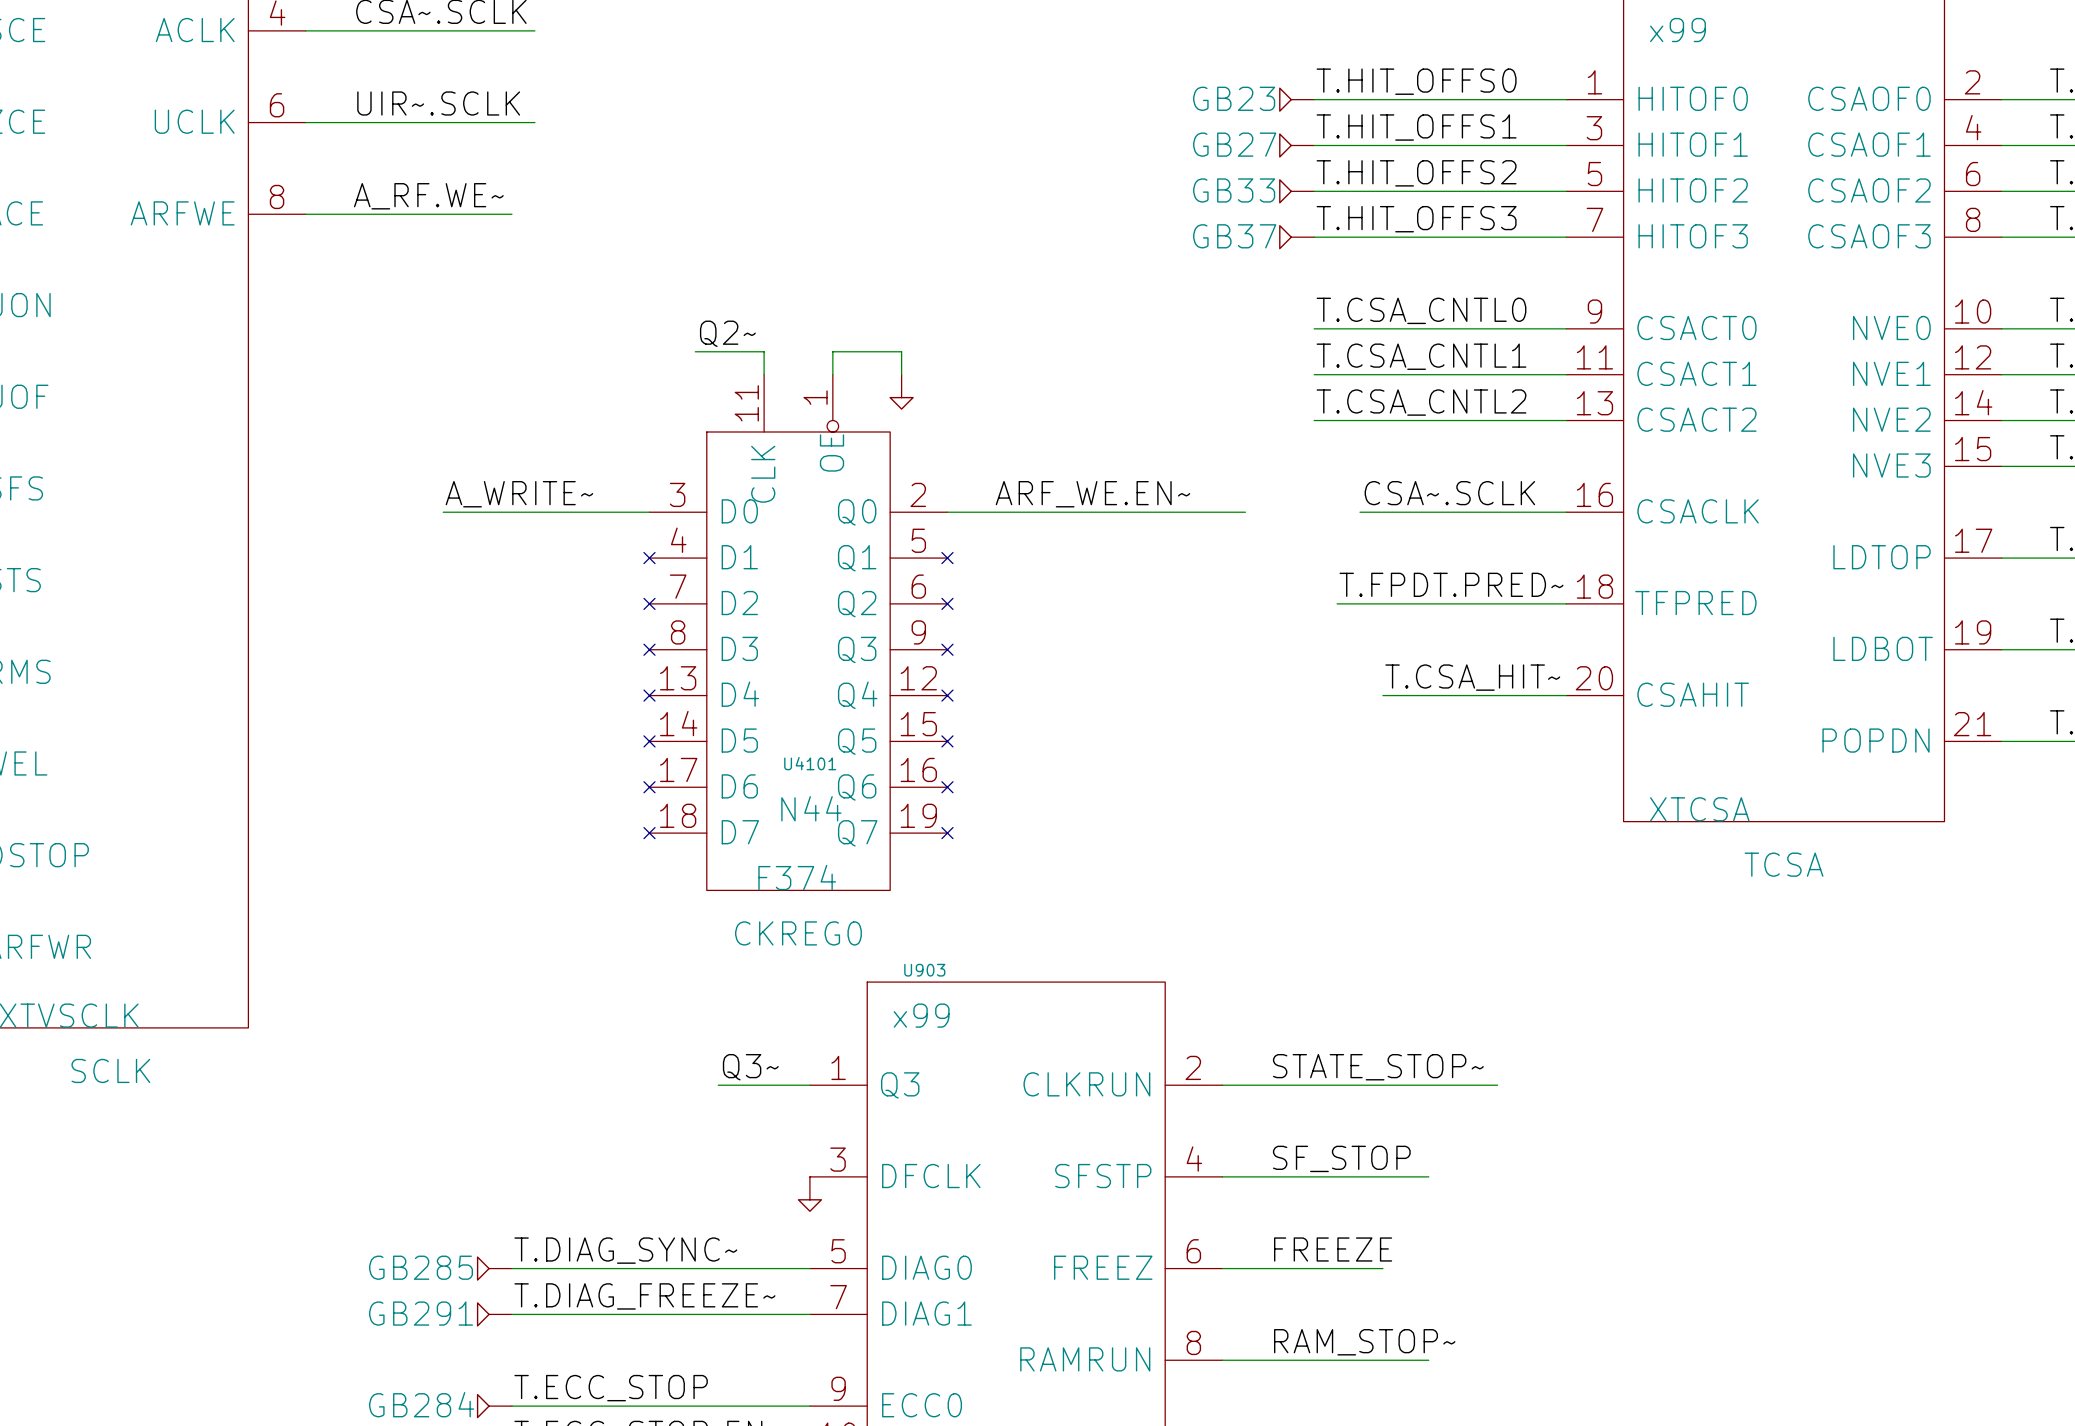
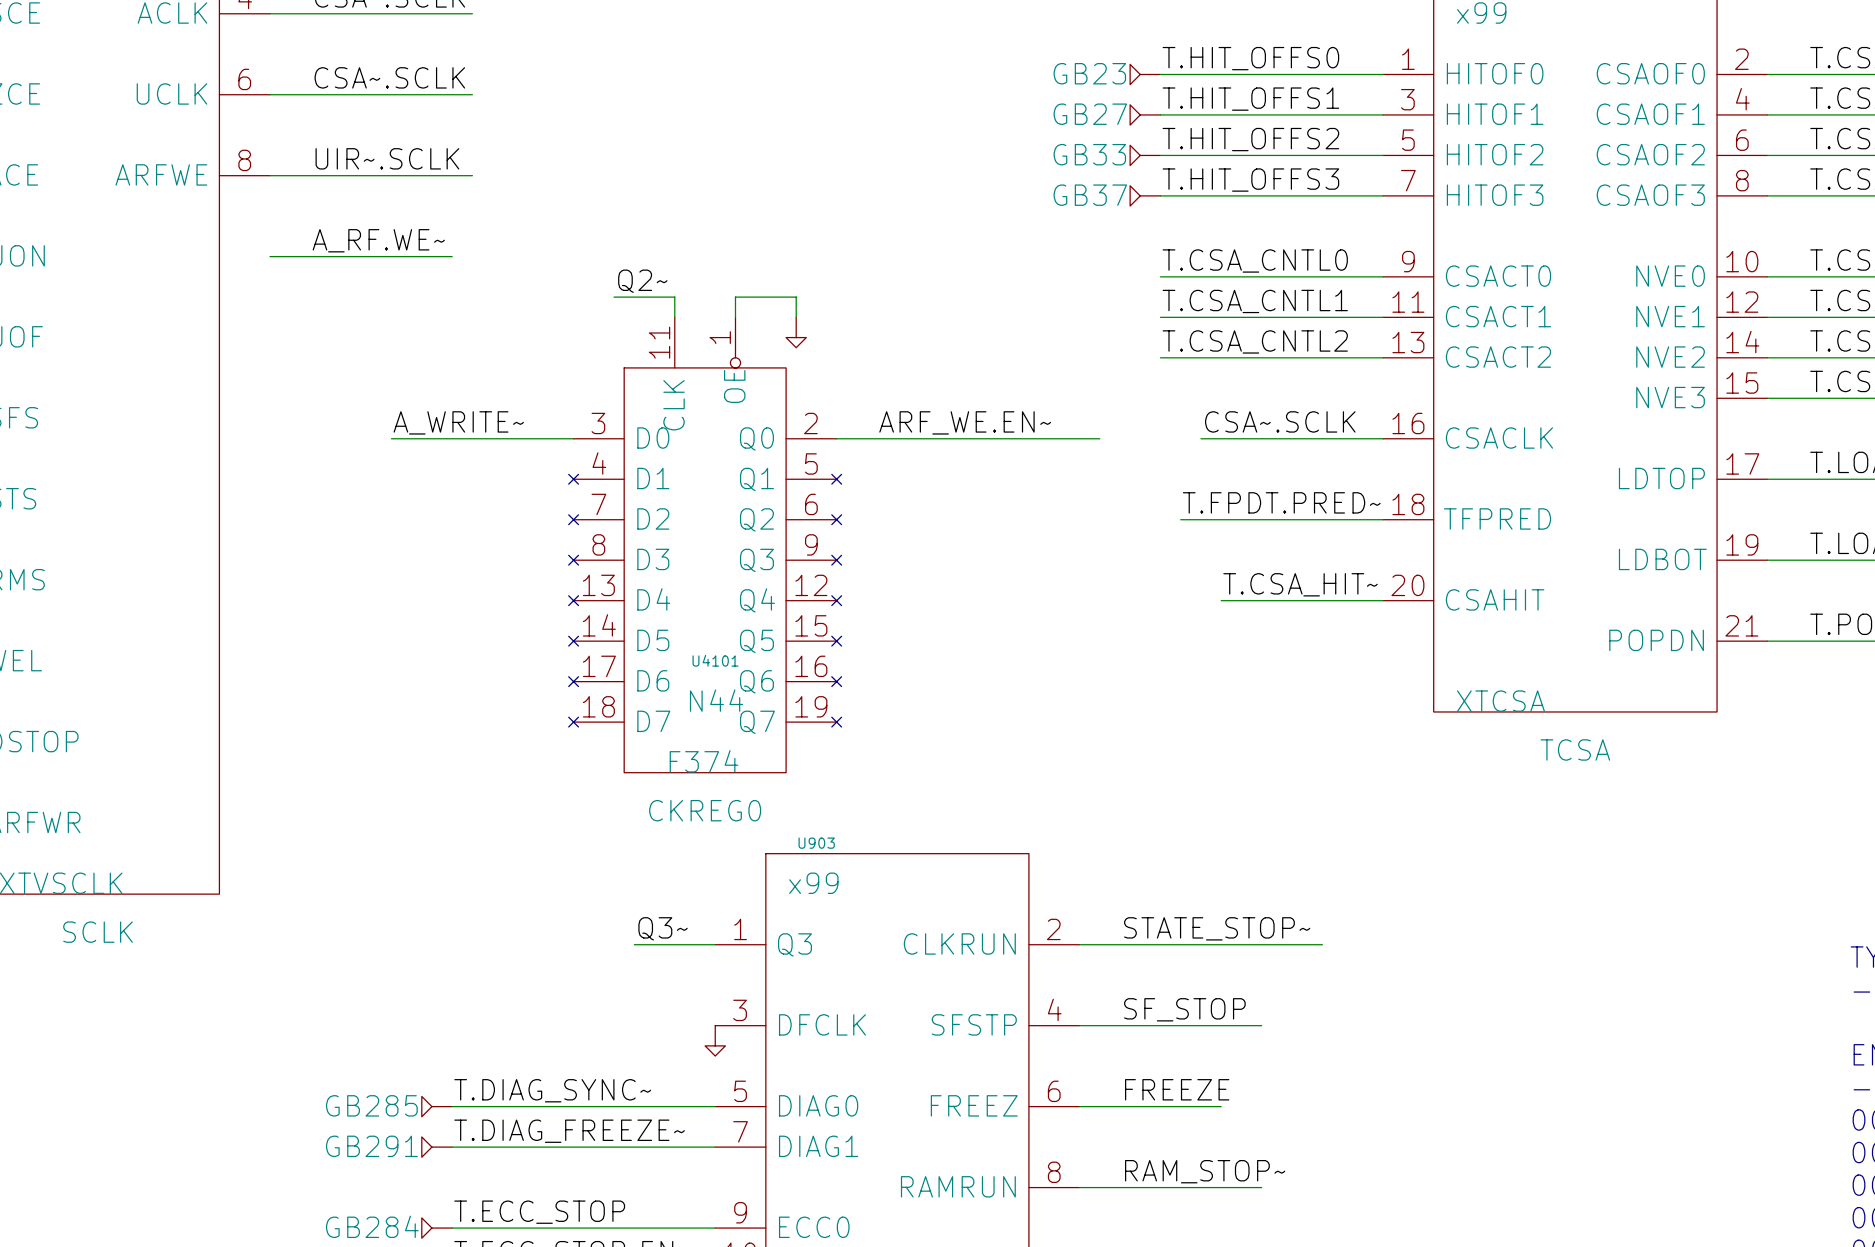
label: UIR~.SCLK (438, 103) -> CSA~.SCLK (389, 77)
label: A_RF.WE~ (428, 196) -> UIR~.SCLK (387, 158)
wire: none -> (452, 175) (472, 175)
label: none -> A_RF.WE~ (378, 240)
wire: none -> (270, 256) (452, 256)

